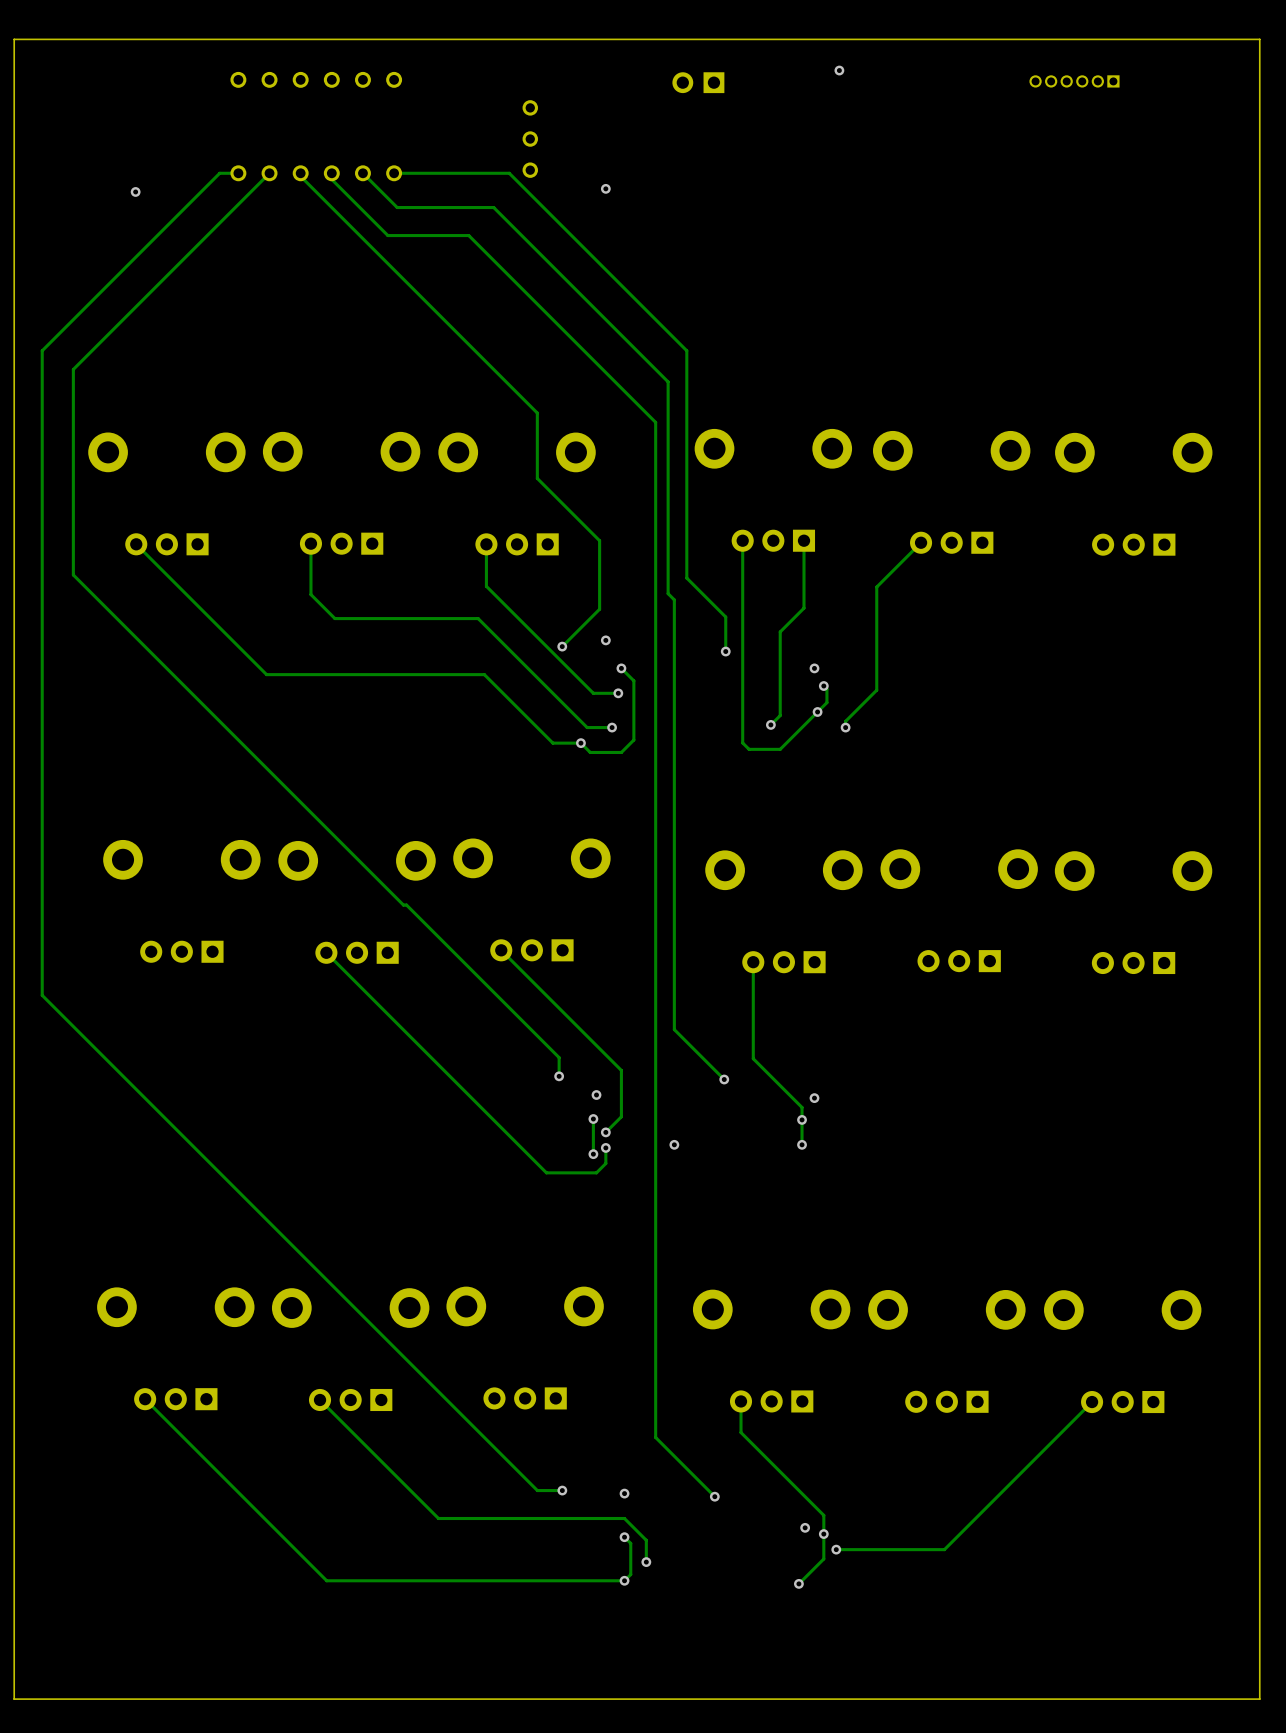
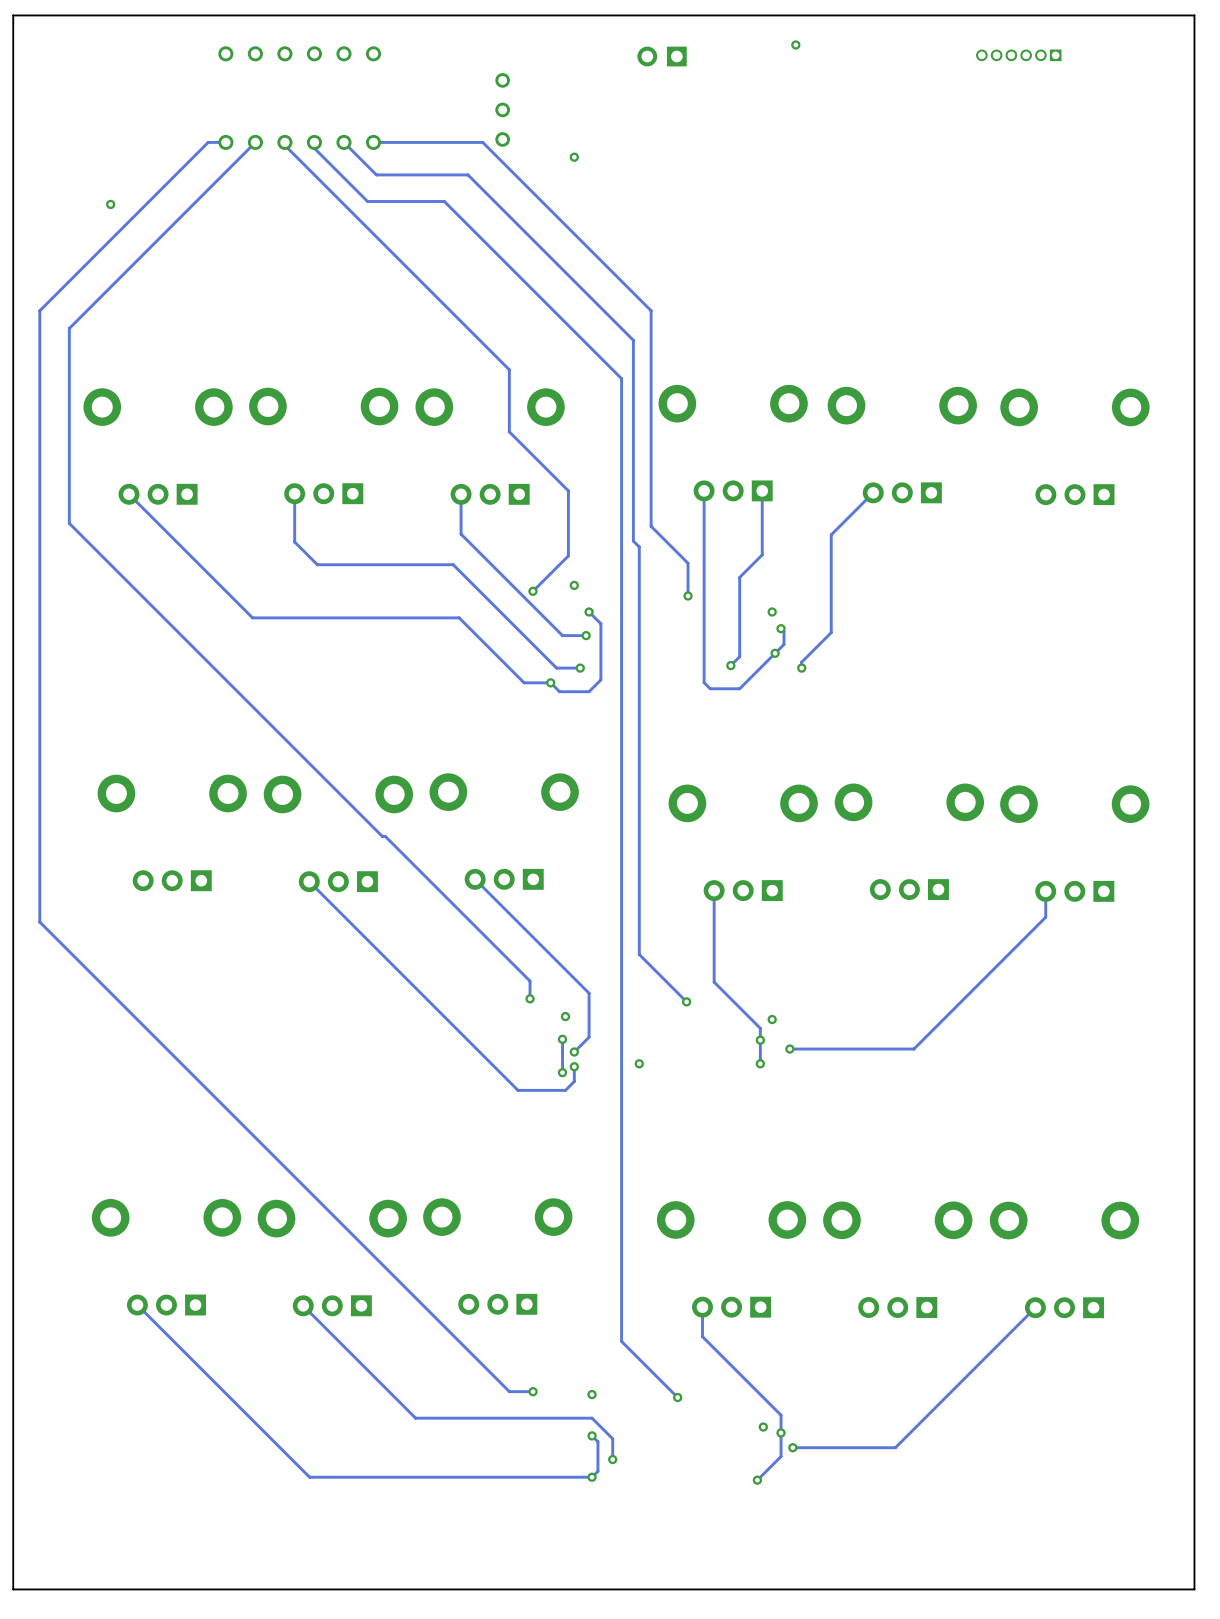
via position: (135, 191) -> (110, 204)
track: none -> (1045, 891) (1045, 917) (913, 1049) (789, 1049)
via: none -> (789, 1049)

